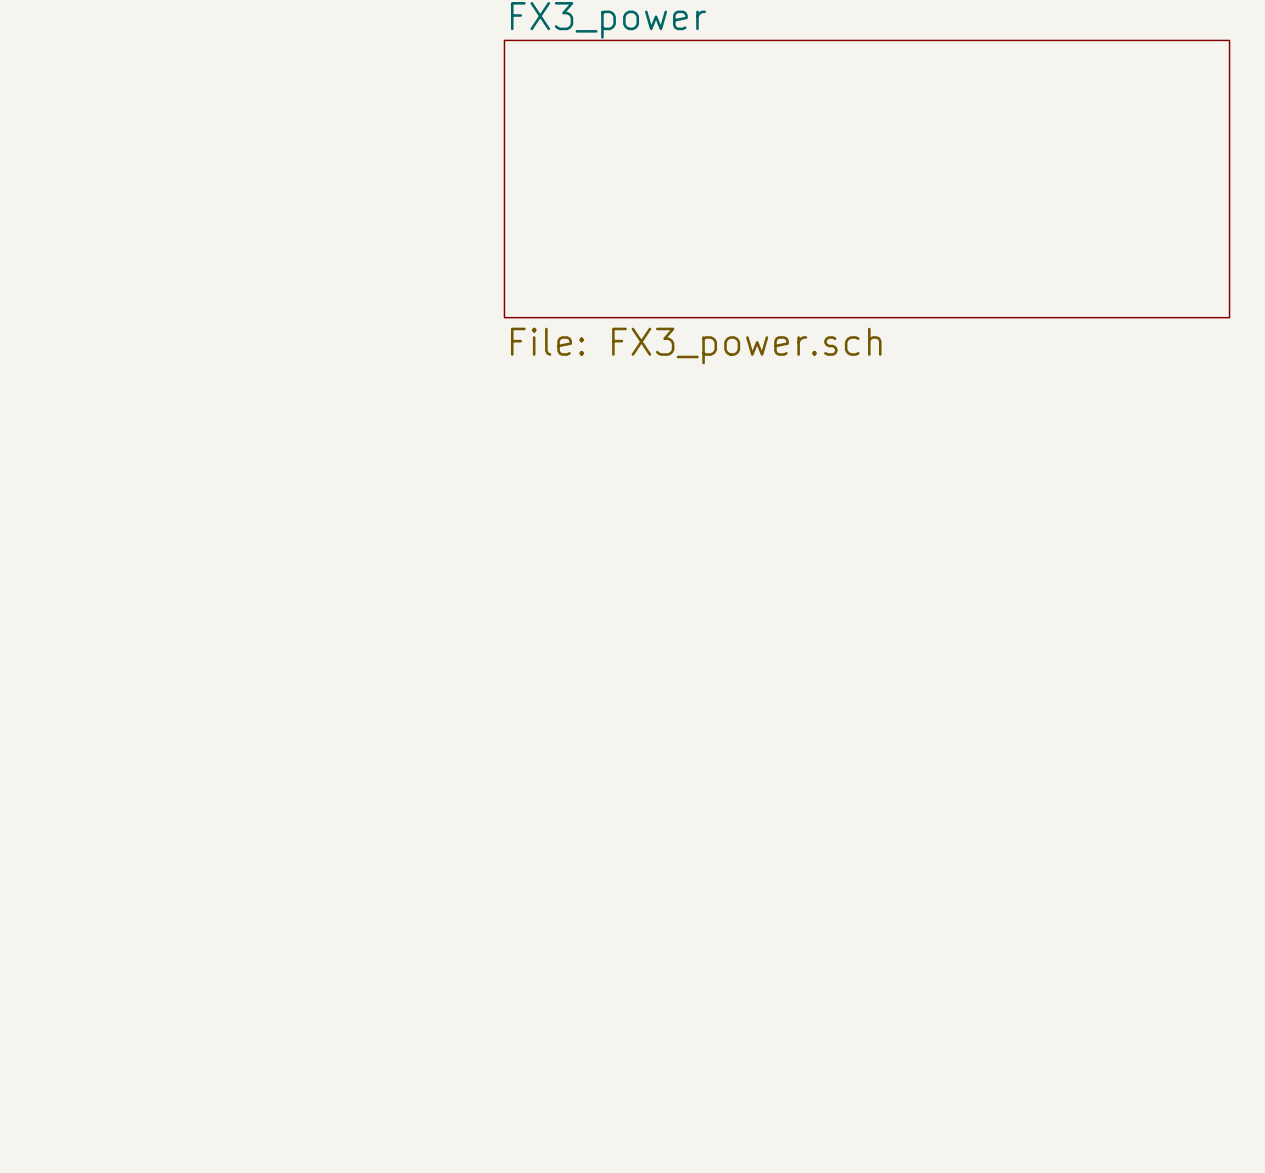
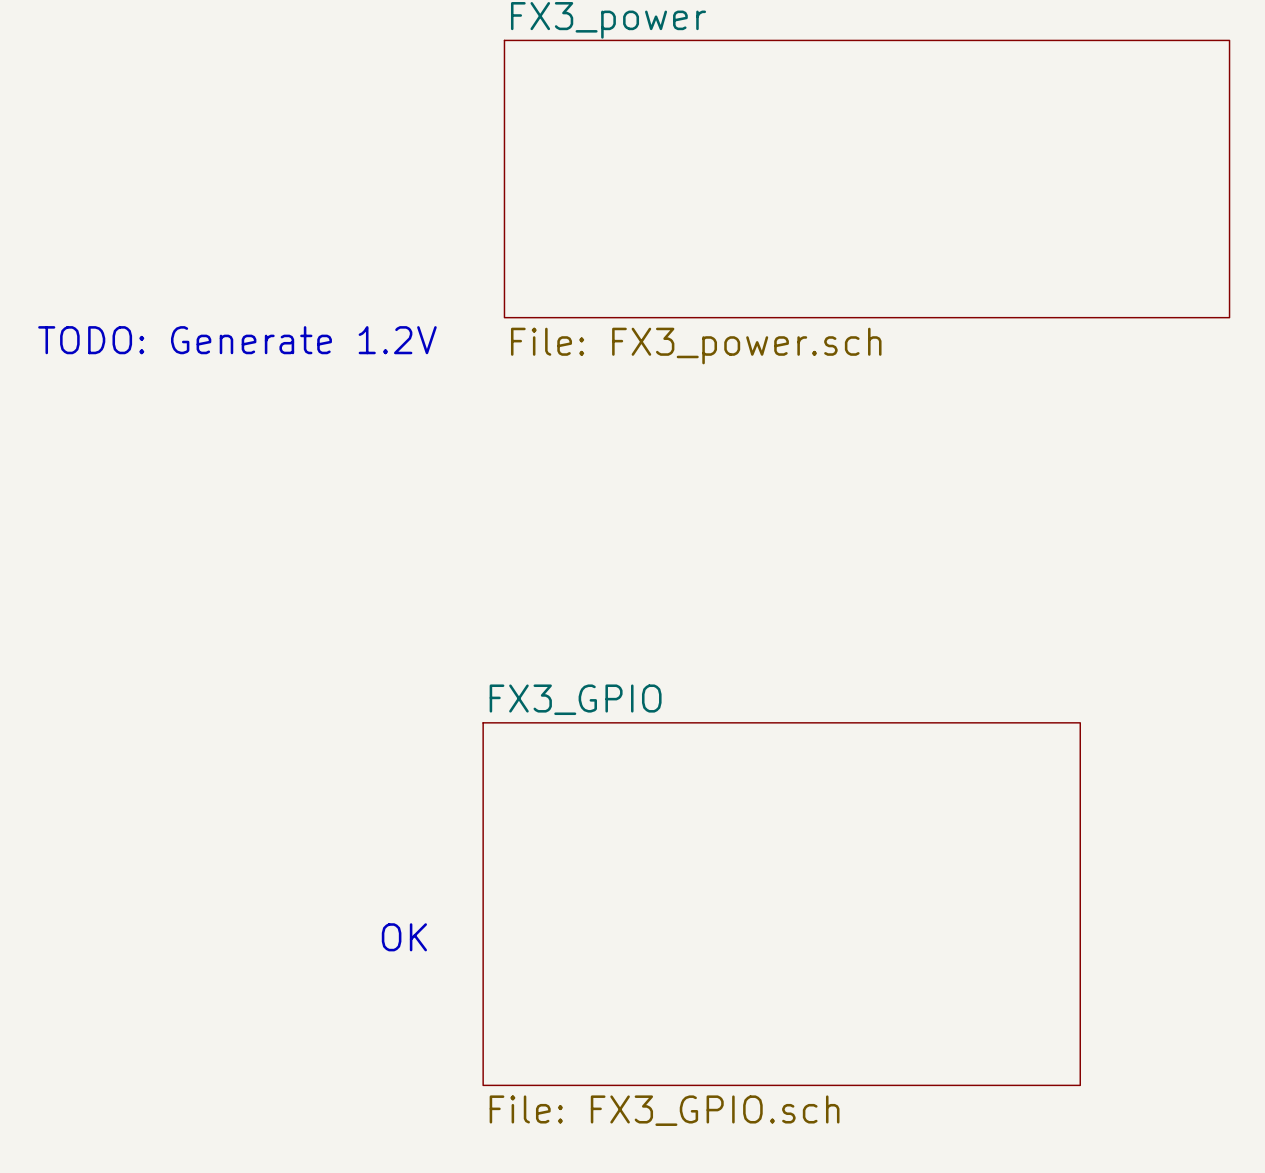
text: none -> TODO: Generate 1.2V (237, 340)
sheet FX3_GPIO: none -> File: FX3_GPIO.sch (781, 904)
text: none -> OK (404, 937)

